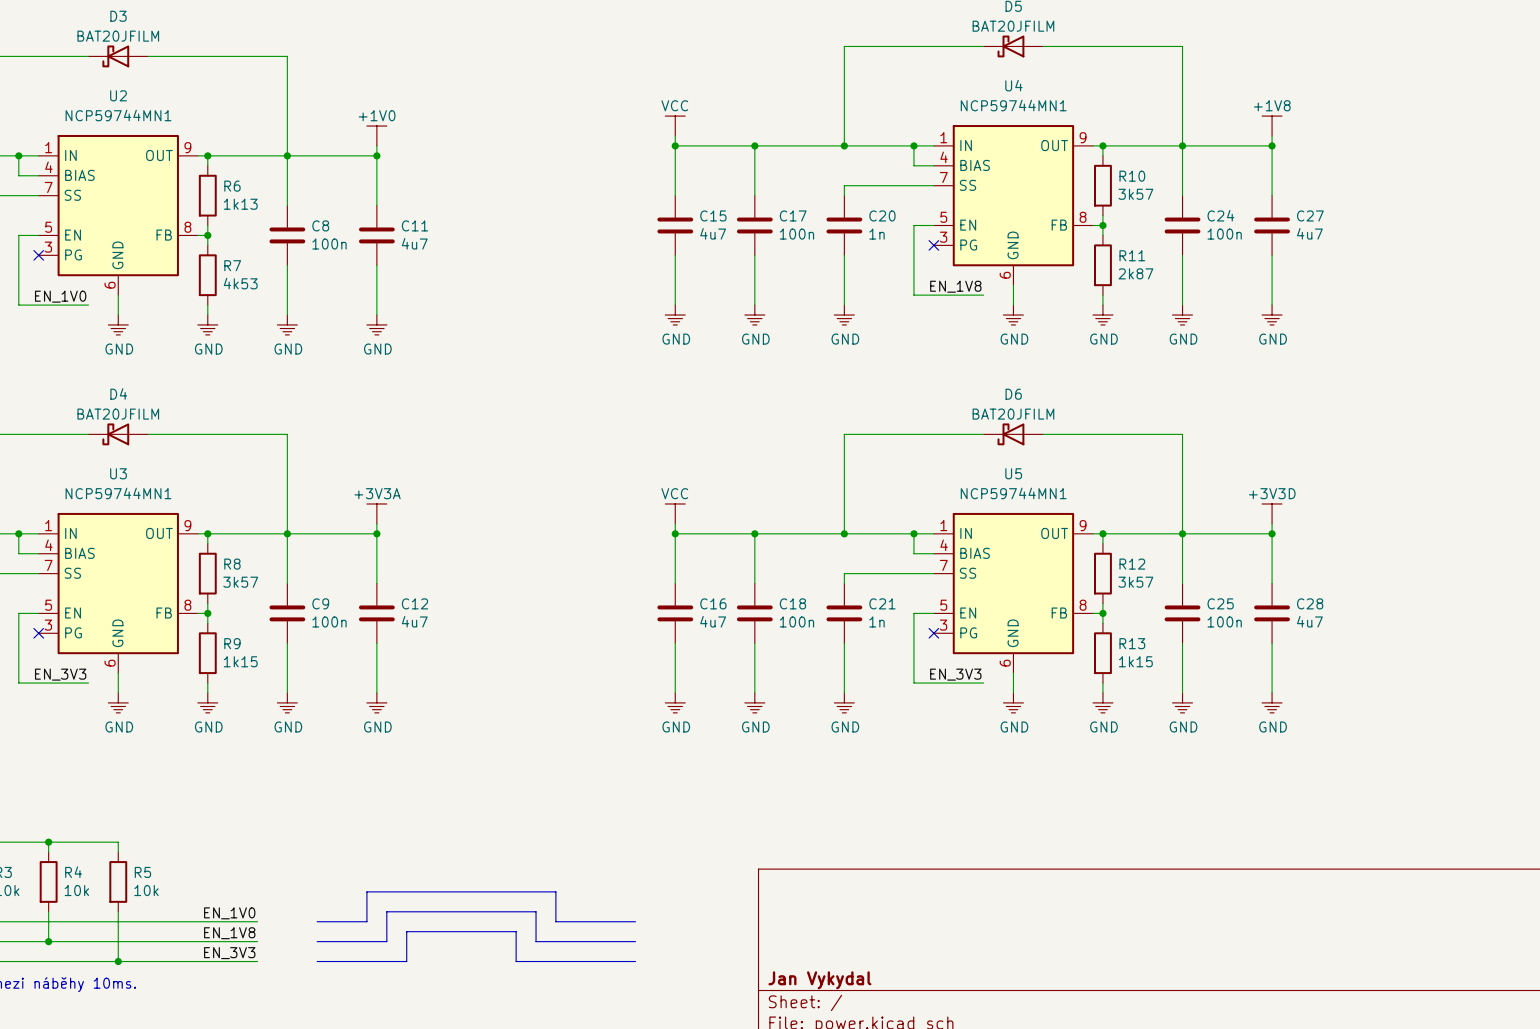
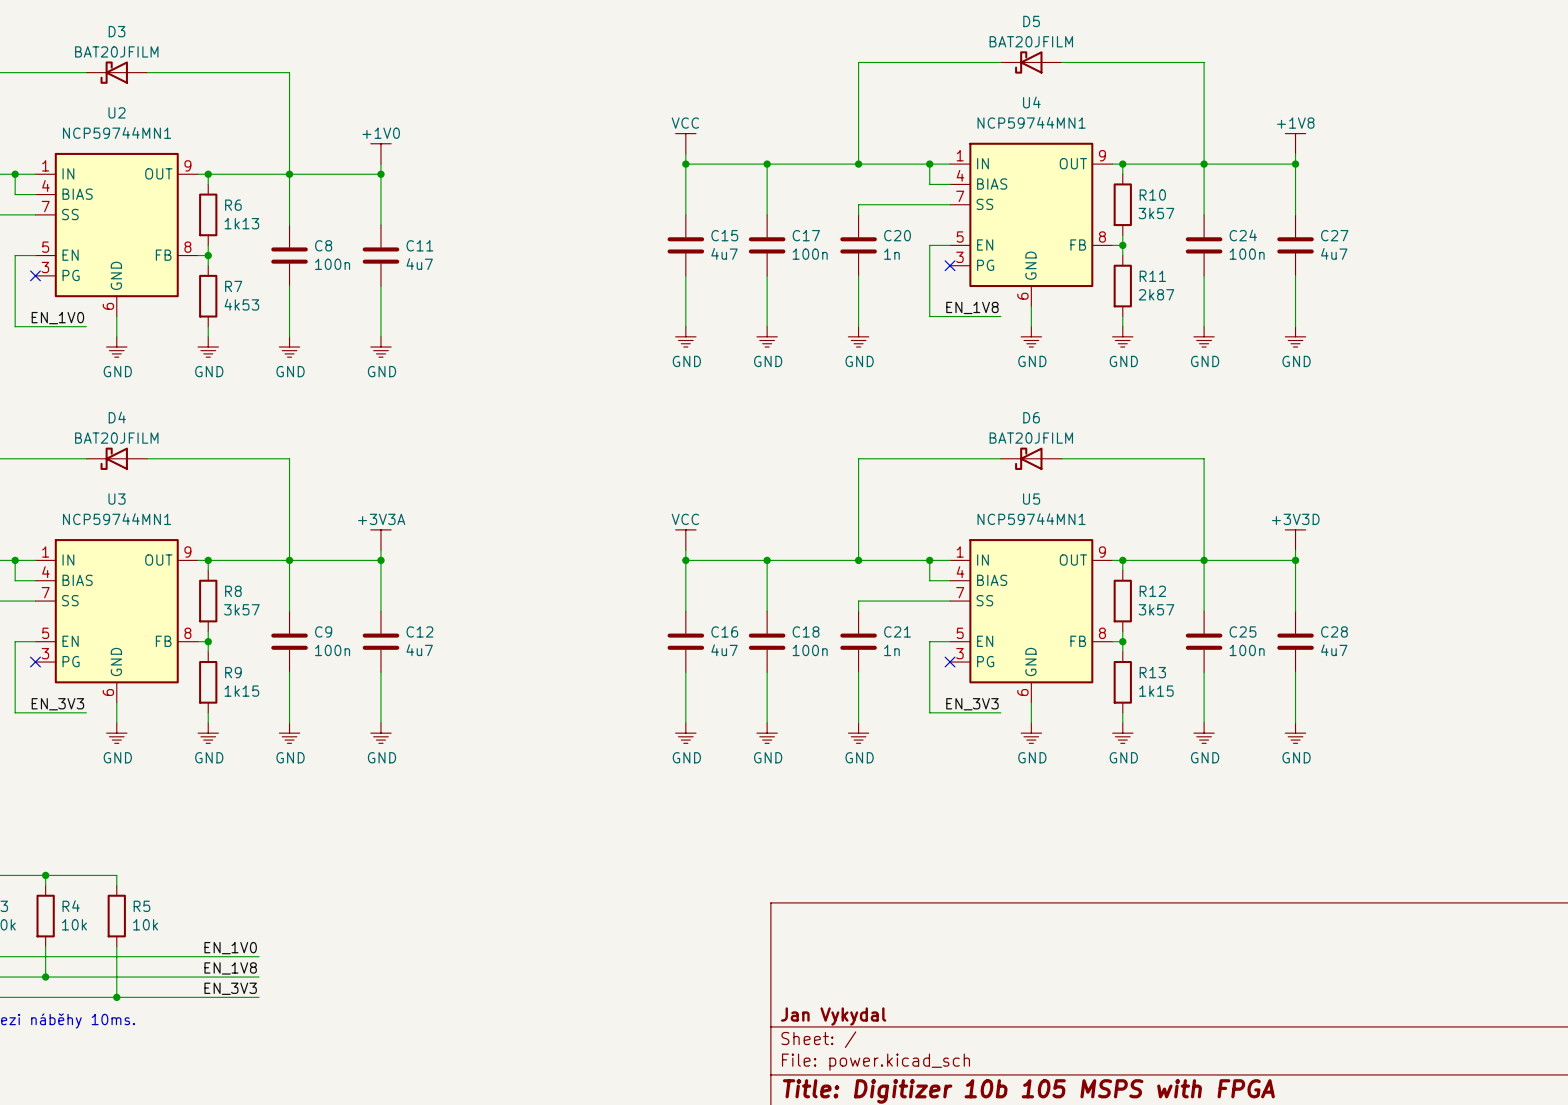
line: (317, 921) (366, 921) (366, 891) (555, 891) (555, 921) (635, 921) -> none
line: (317, 941) (386, 941) (386, 911) (536, 911) (536, 941) (635, 941) -> none
line: (317, 961) (406, 961) (406, 931) (516, 931) (516, 961) (635, 961) -> none

